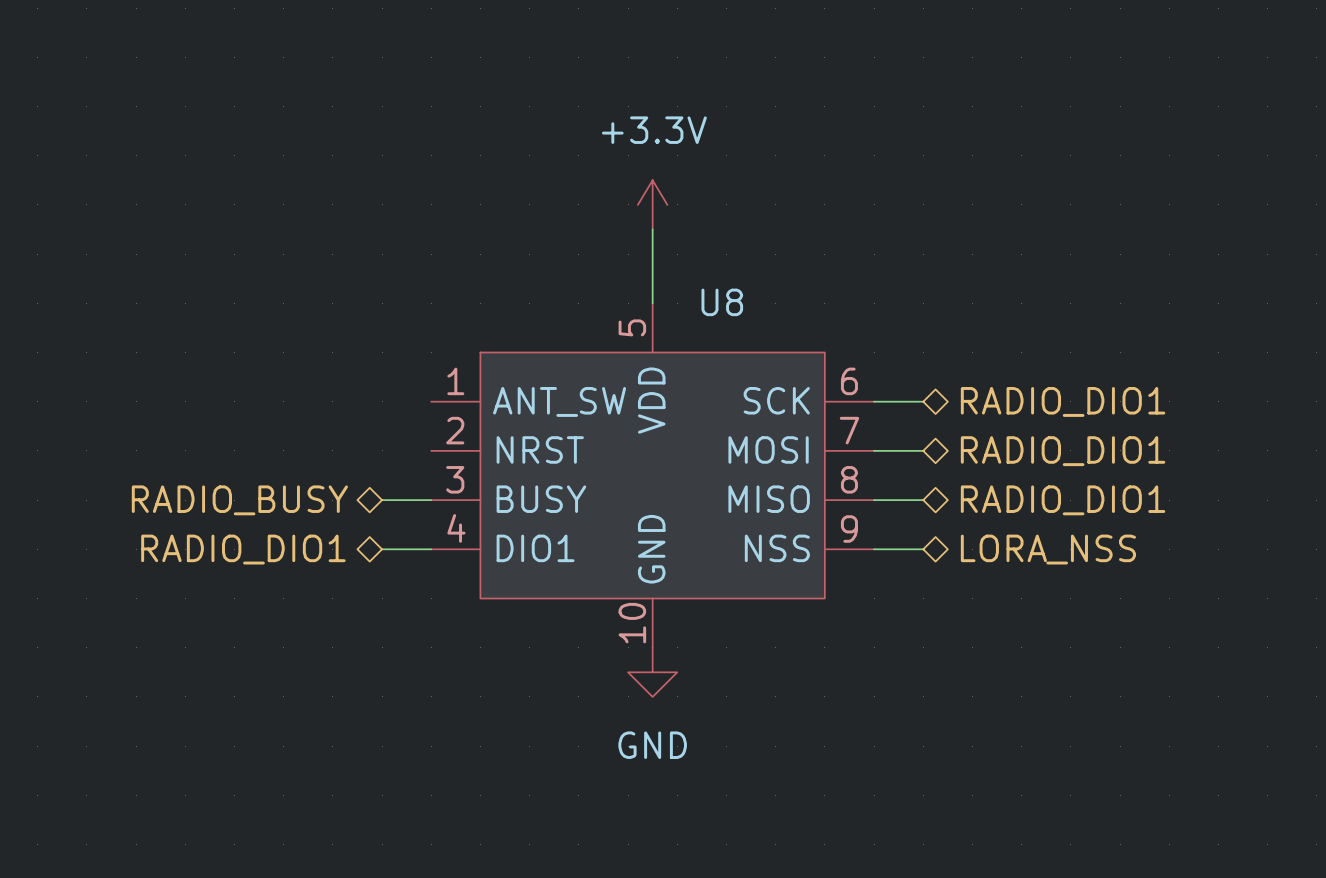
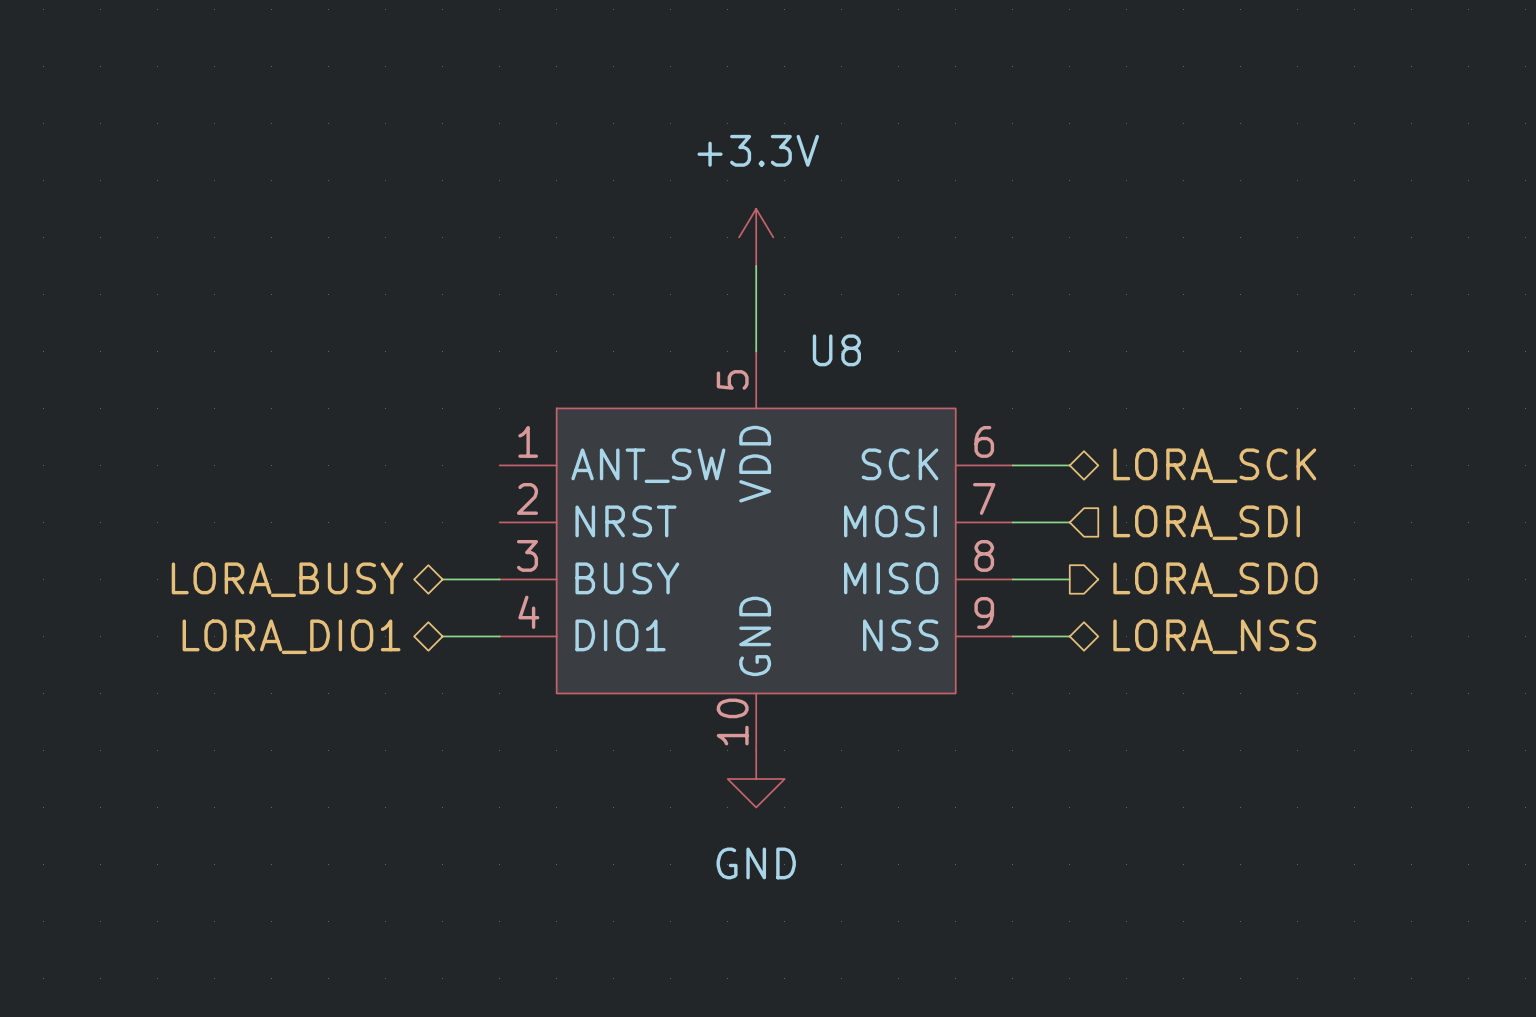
hierarchical label: RADIO_DIO1 (1063, 401) -> LORA_SCK (1214, 465)
hierarchical label shape: bidirectional (1063, 451) -> input (1206, 522)
hierarchical label: RADIO_DIO1 (1063, 451) -> LORA_SDI (1206, 522)
hierarchical label: RADIO_BUSY (239, 500) -> LORA_BUSY (287, 579)
hierarchical label shape: bidirectional (1063, 500) -> output (1215, 579)
hierarchical label: RADIO_DIO1 (1063, 500) -> LORA_SDO (1215, 579)
hierarchical label: RADIO_DIO1 (243, 549) -> LORA_DIO1 (291, 636)

